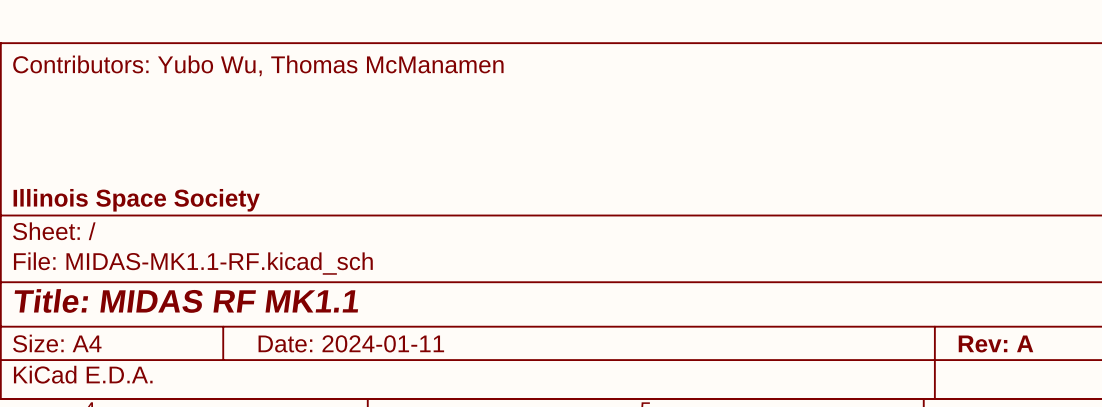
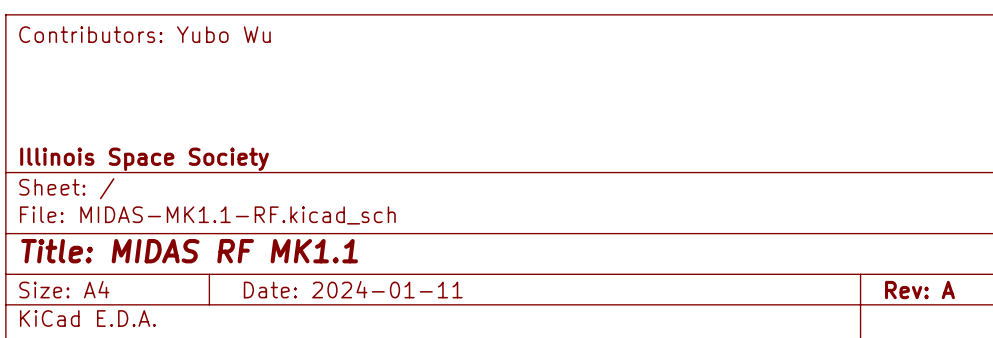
title block: Contributors: Yubo Wu, Thomas McManamen (258, 65) -> Contributors: Yubo Wu (144, 34)

